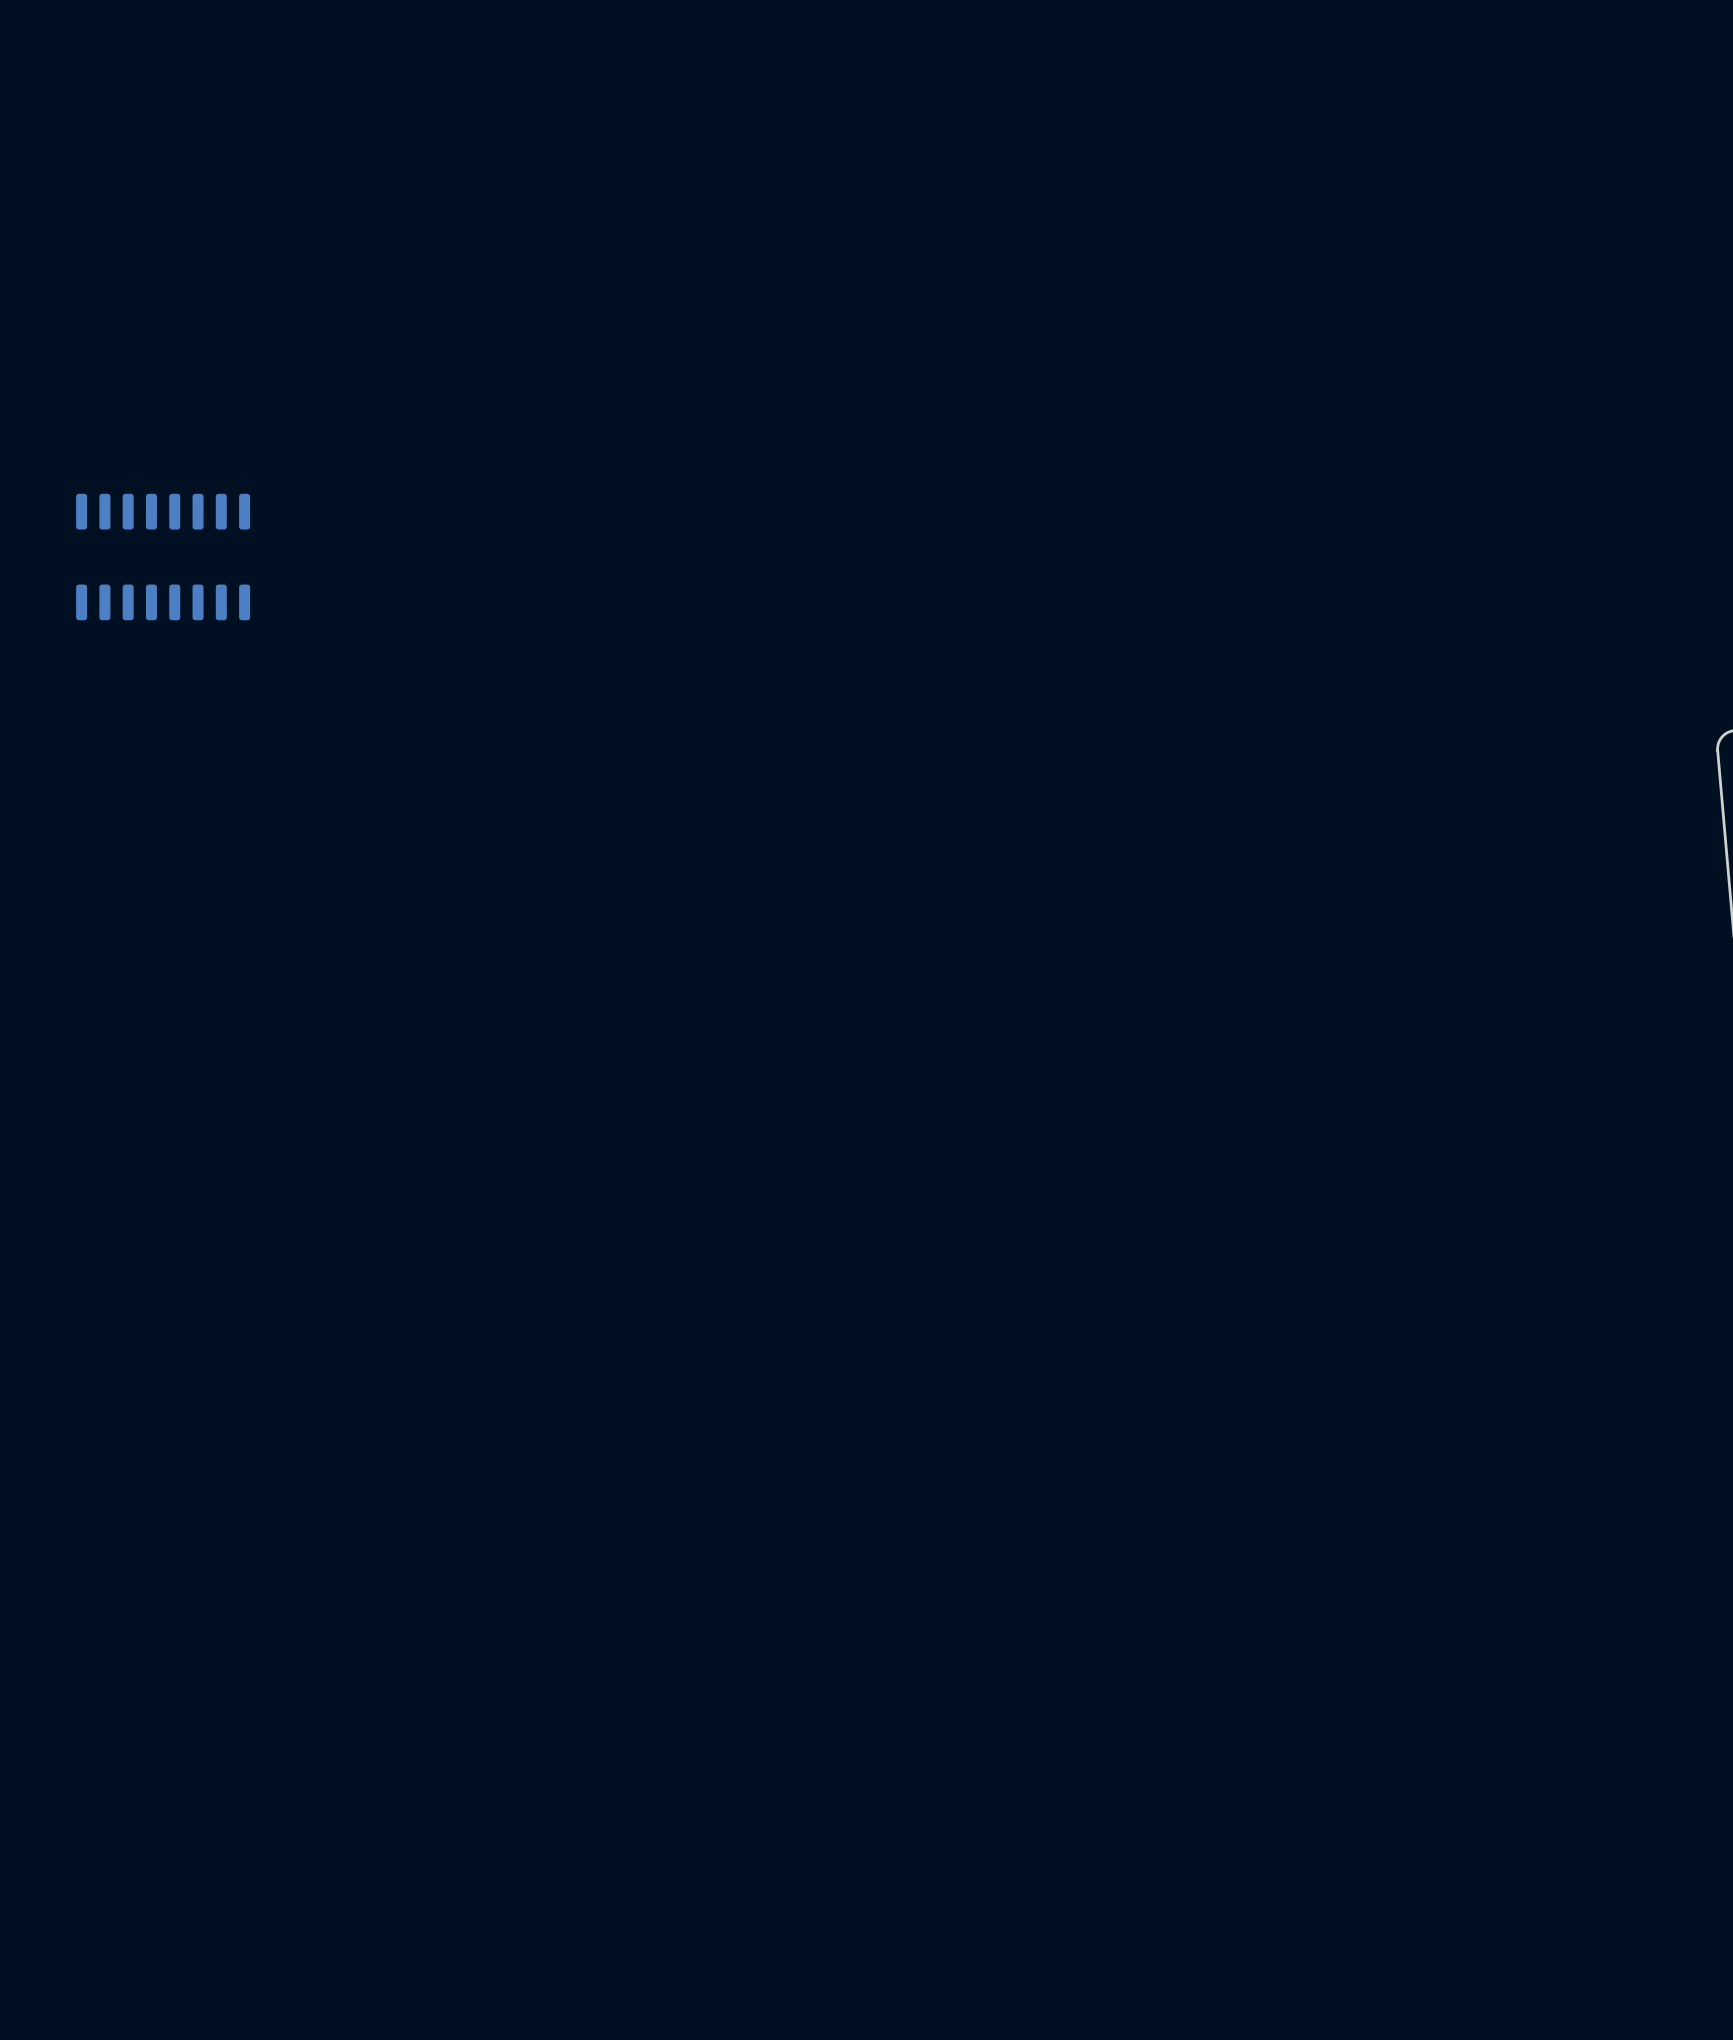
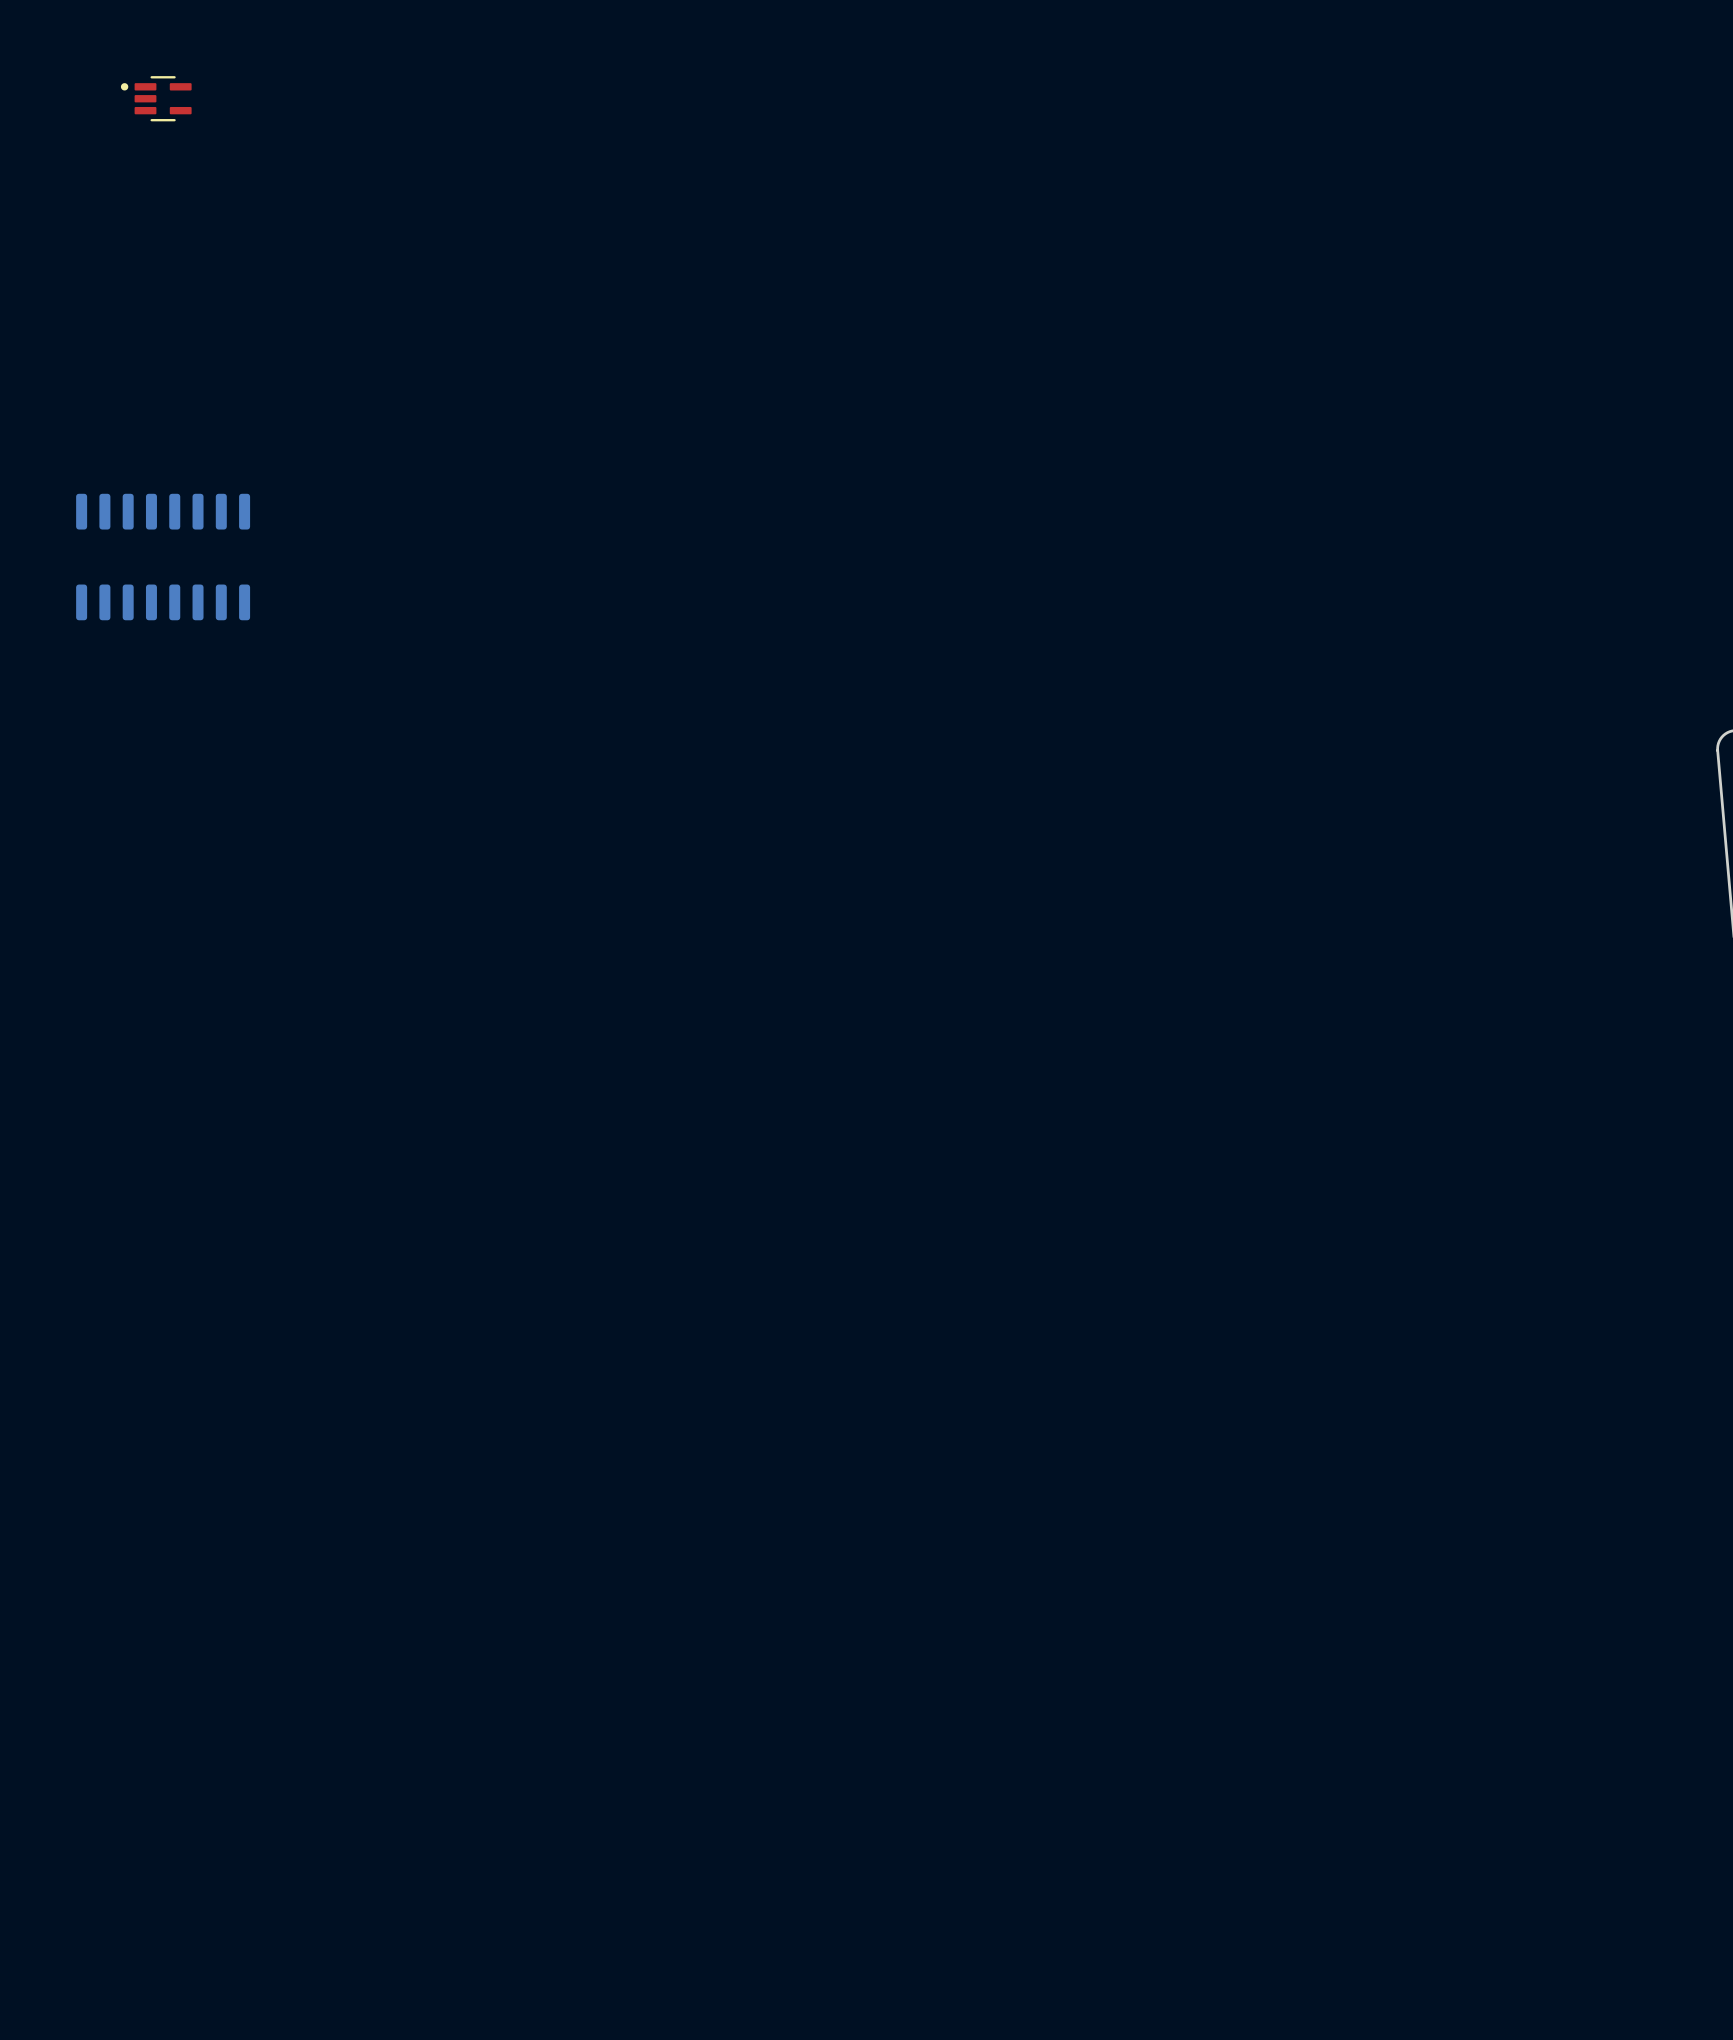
part: none -> (156, 98)

